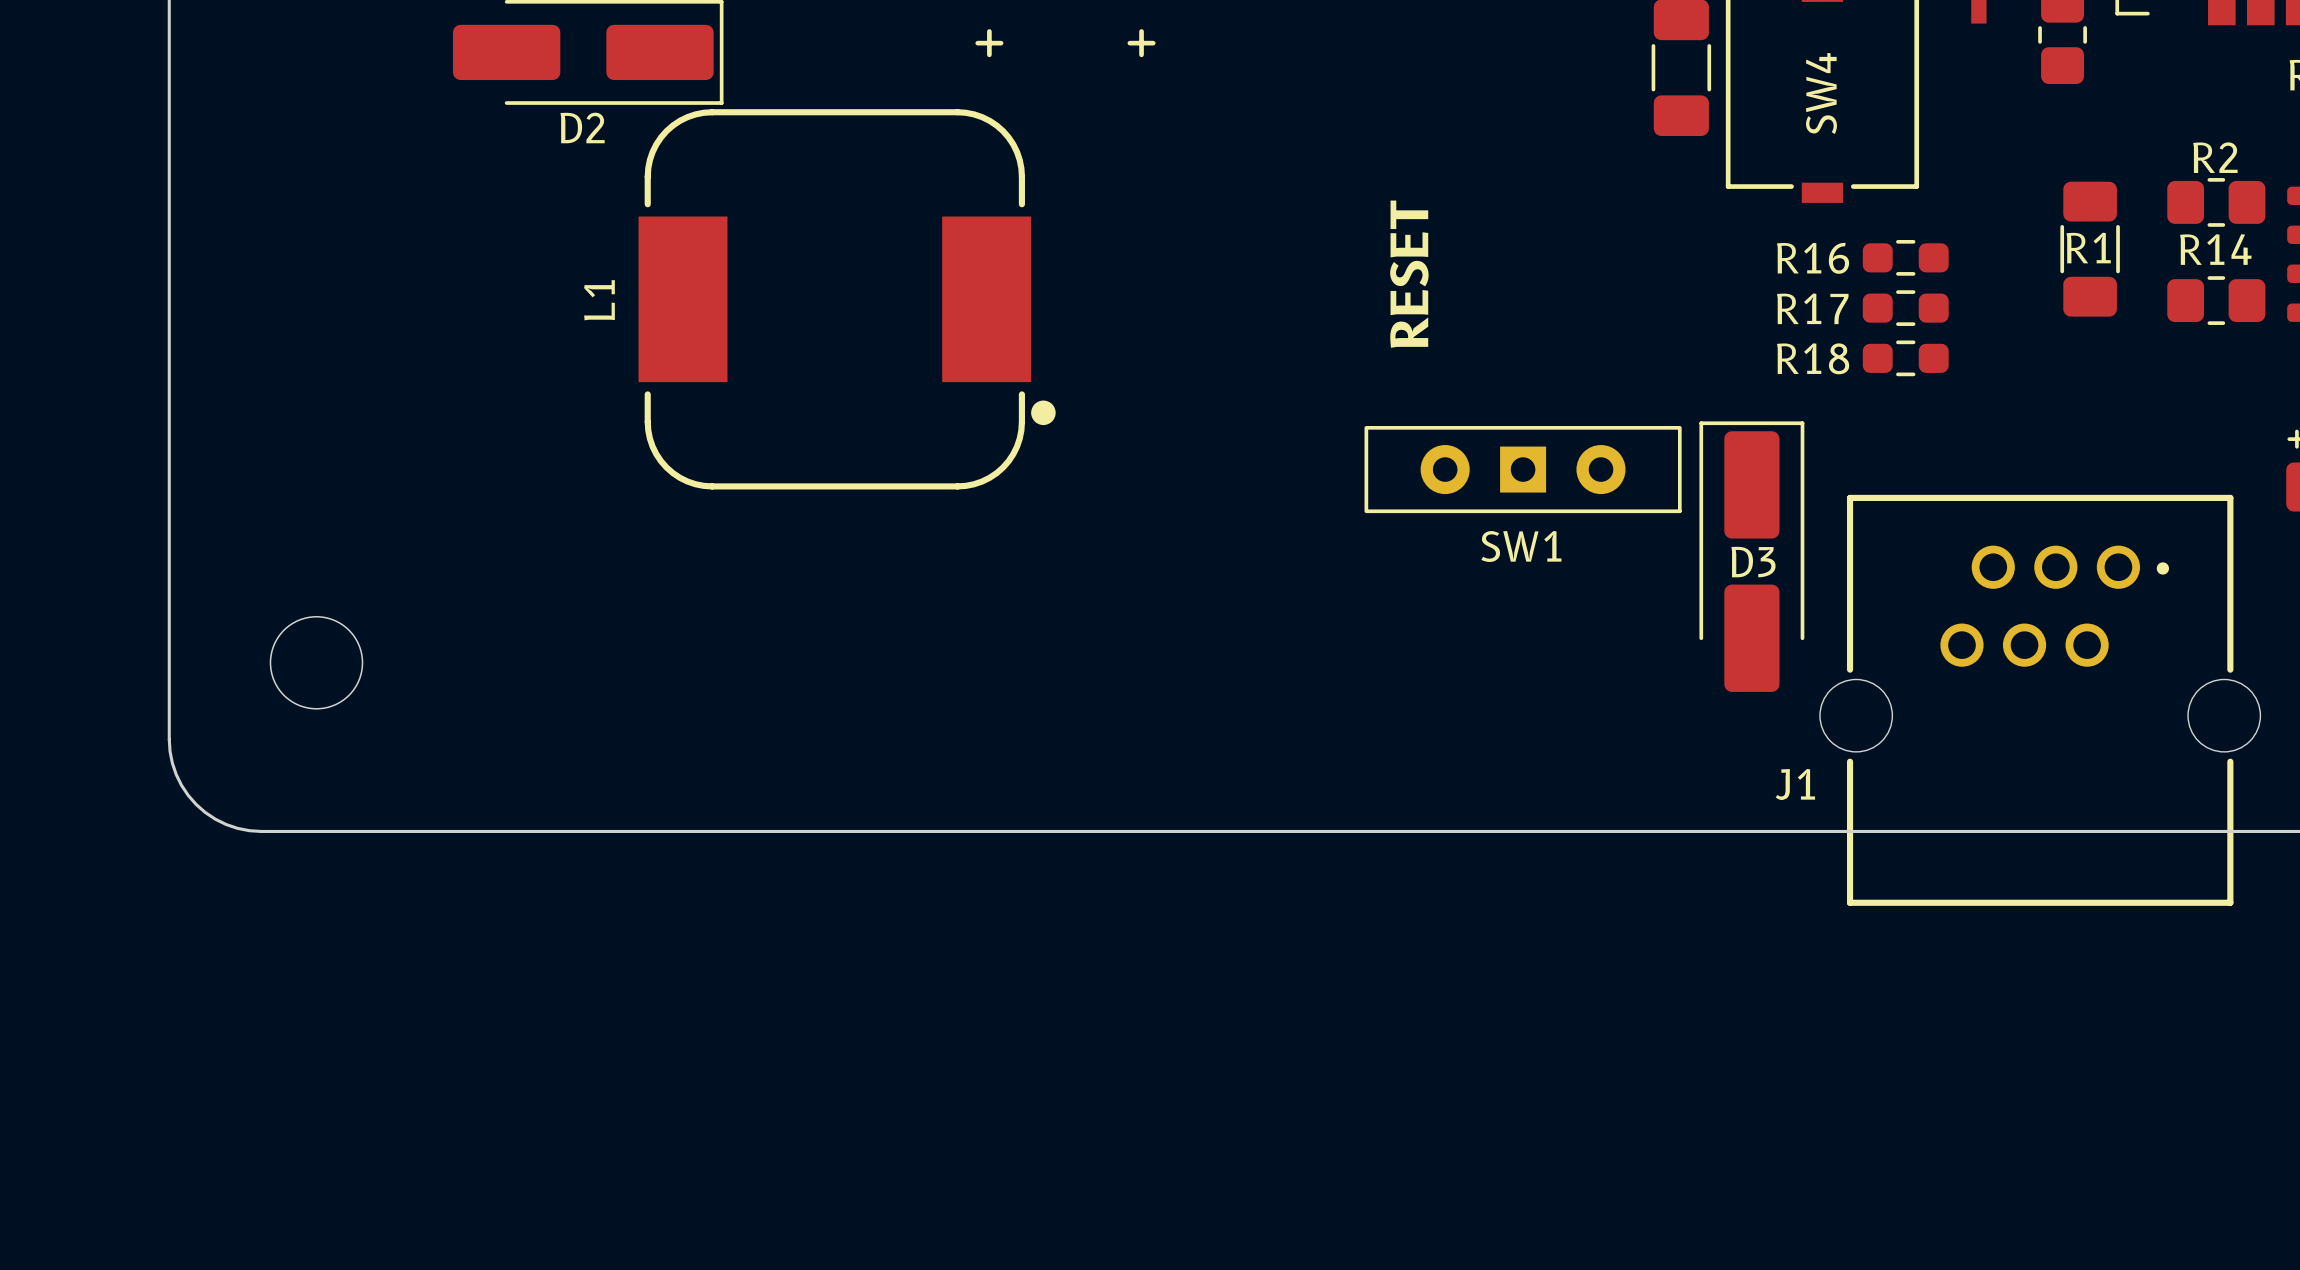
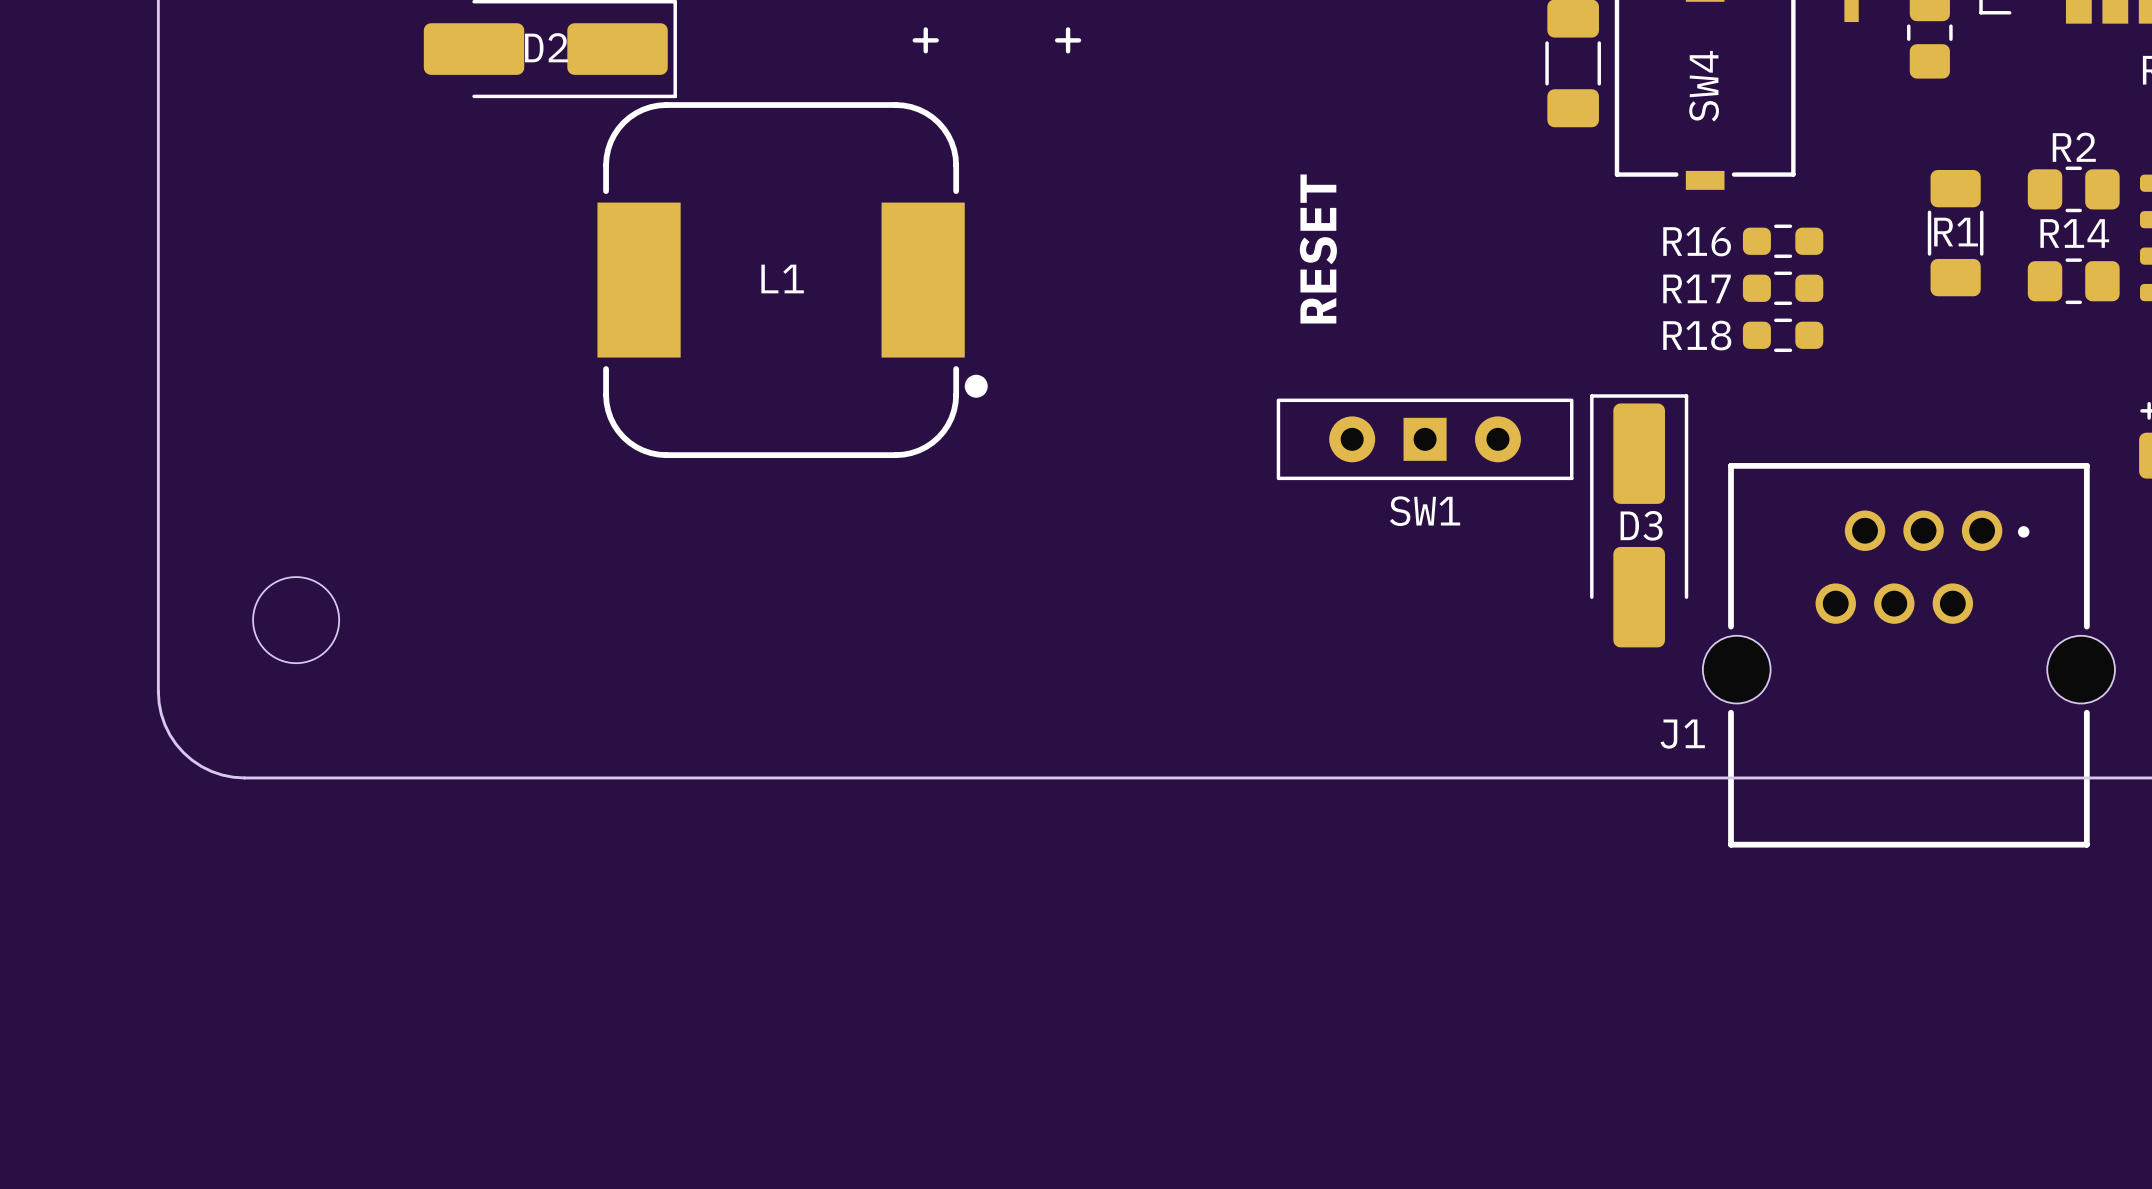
D2 name position: D2 (582, 127) -> D2 (546, 47)
L1 name rotation: 0° (599, 300) -> 90° clockwise (782, 278)
L1 name position: L1 (599, 300) -> L1 (782, 278)

